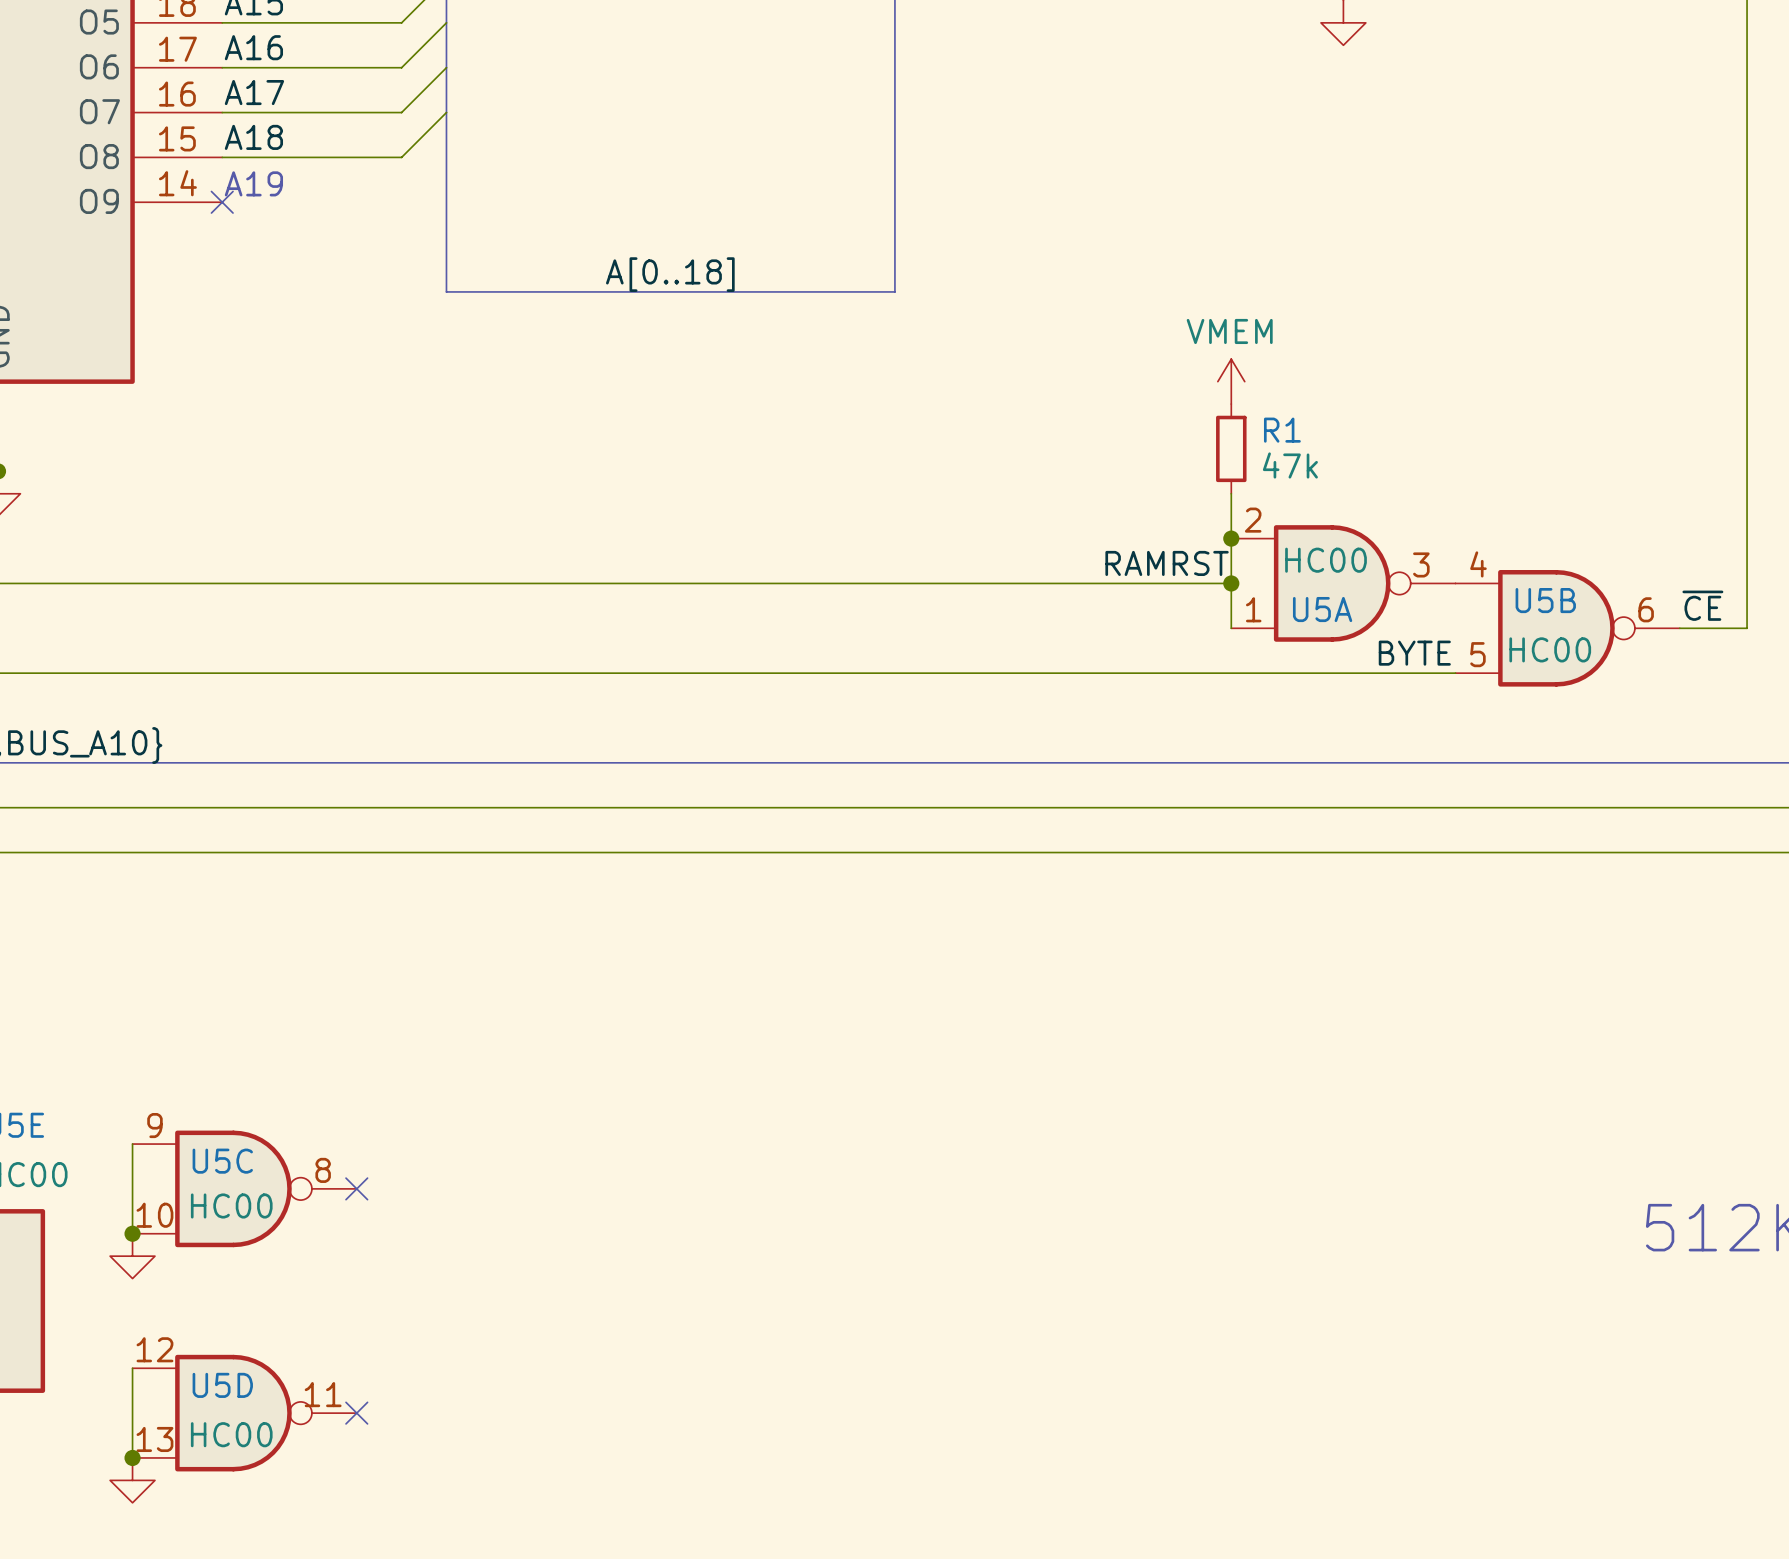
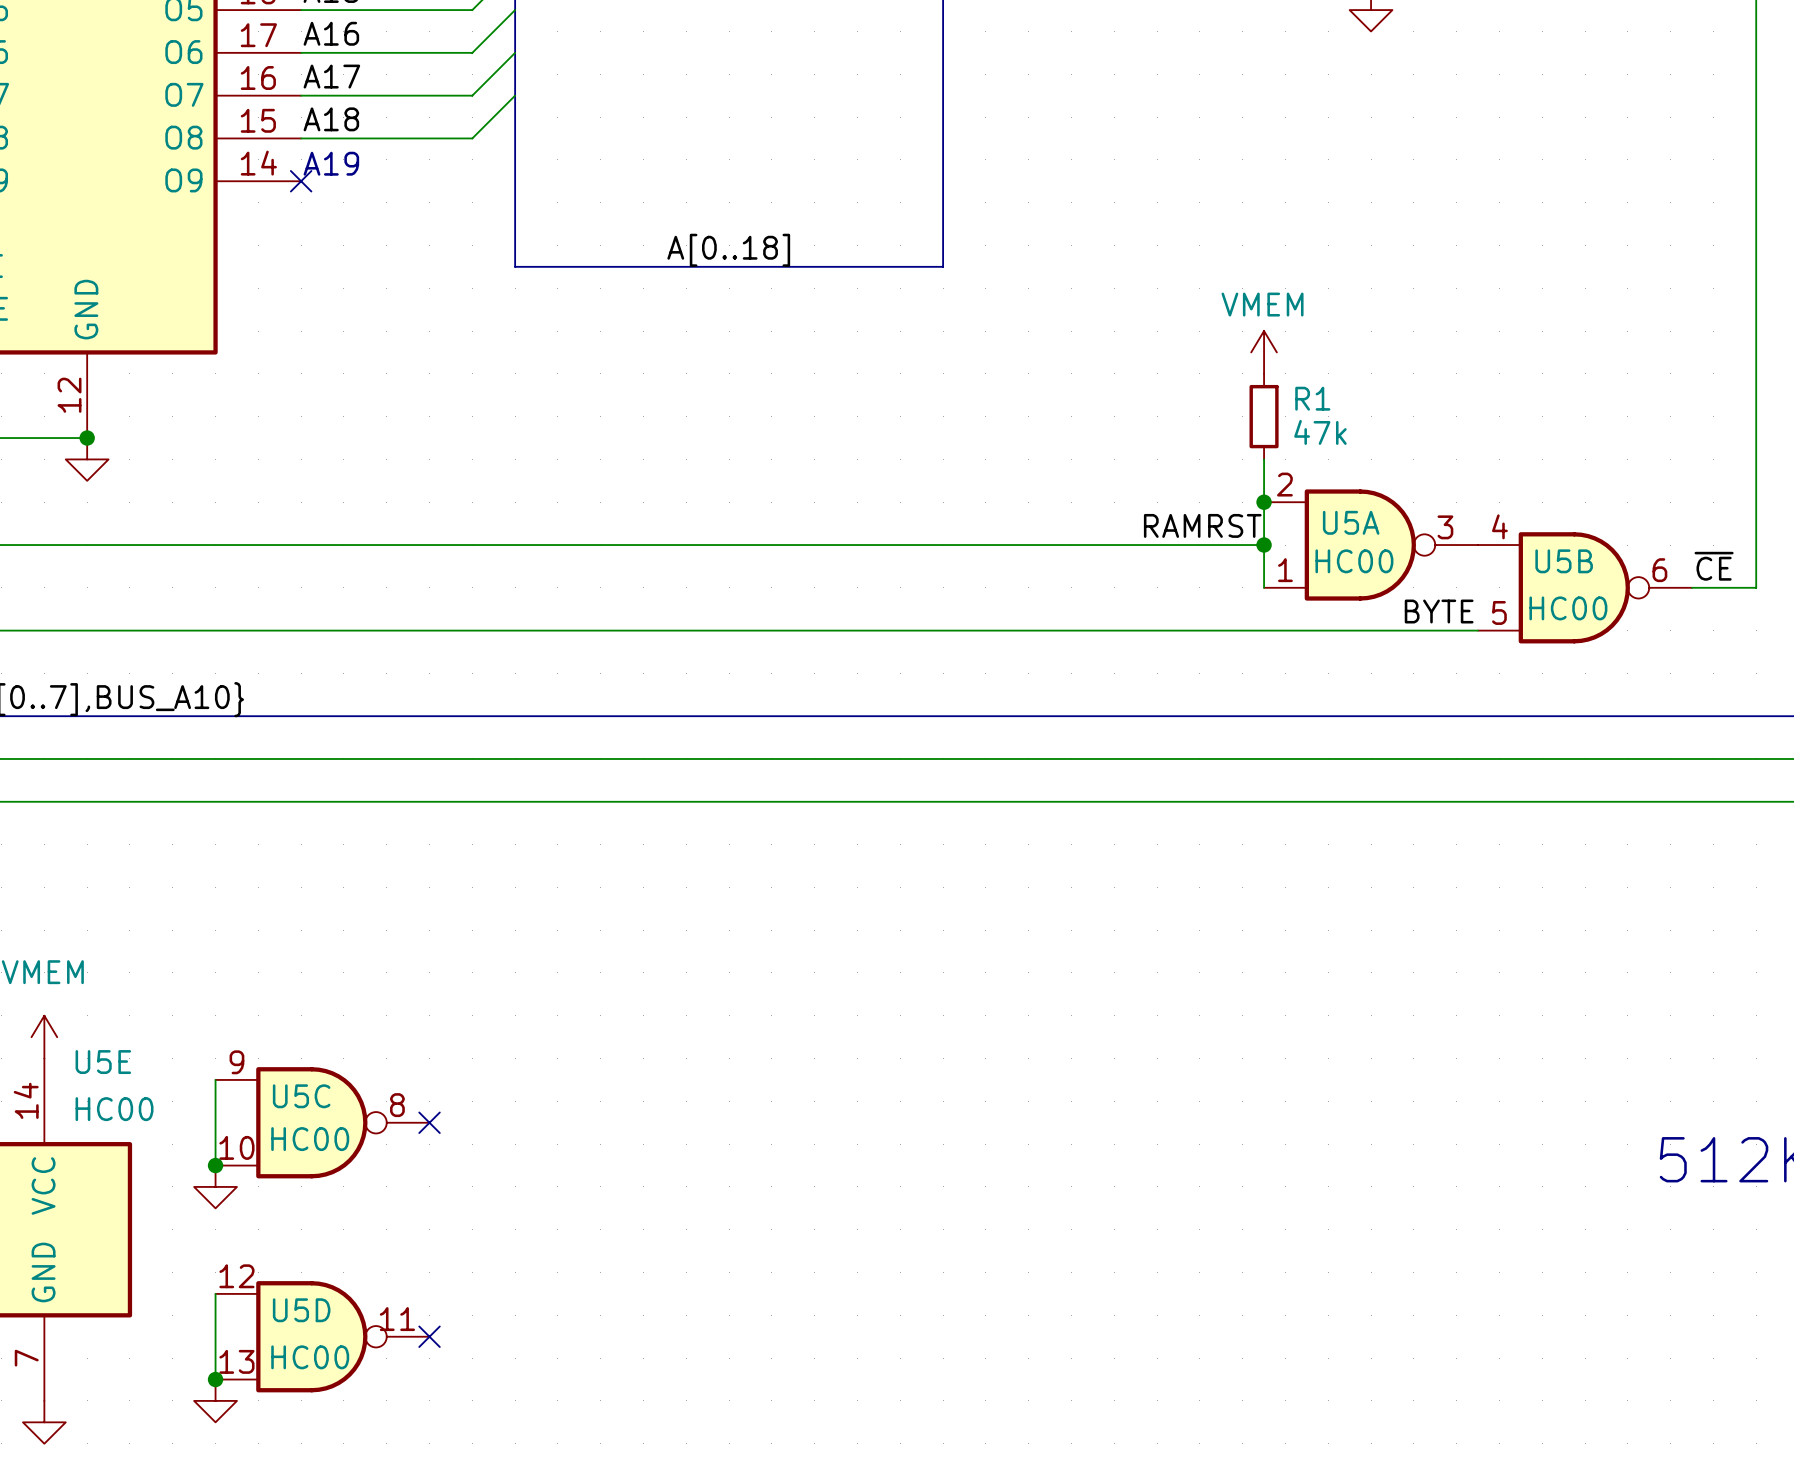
U5A value position: HC00 (1326, 560) -> HC00 (1354, 561)
U5A name position: U5A (1322, 609) -> U5A (1351, 522)

